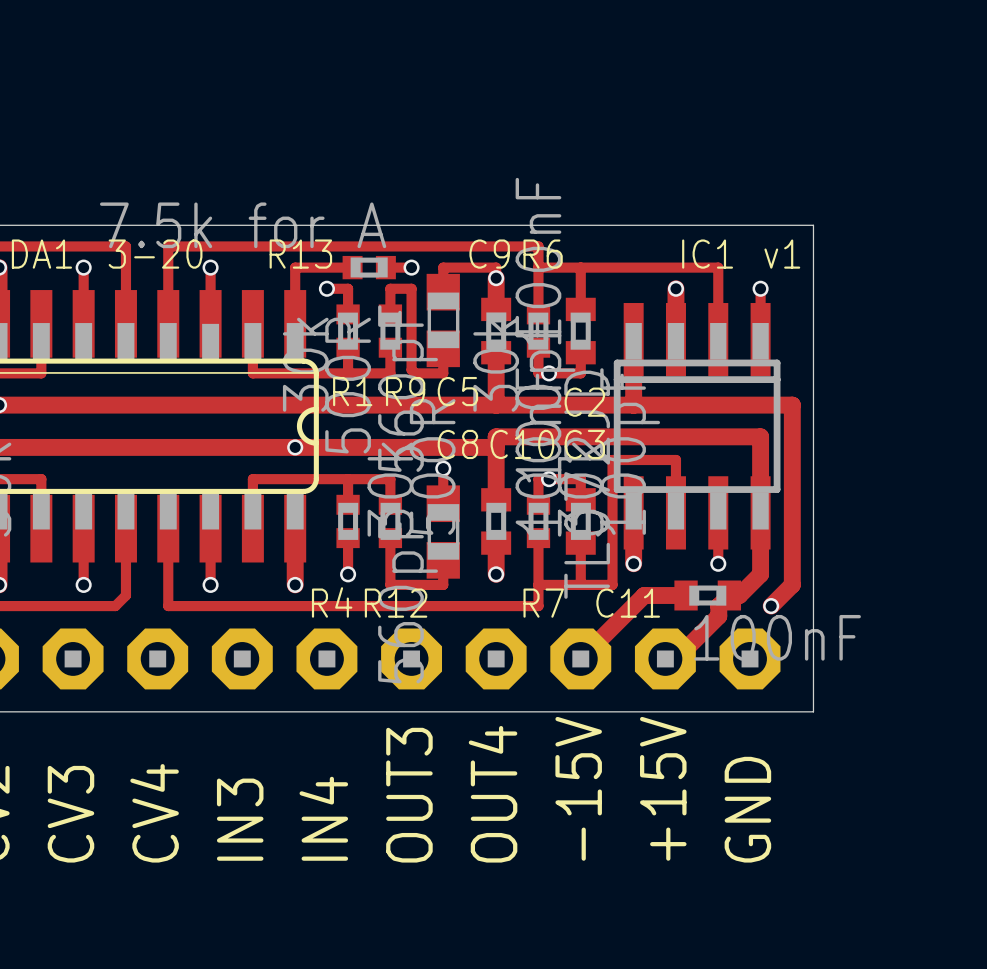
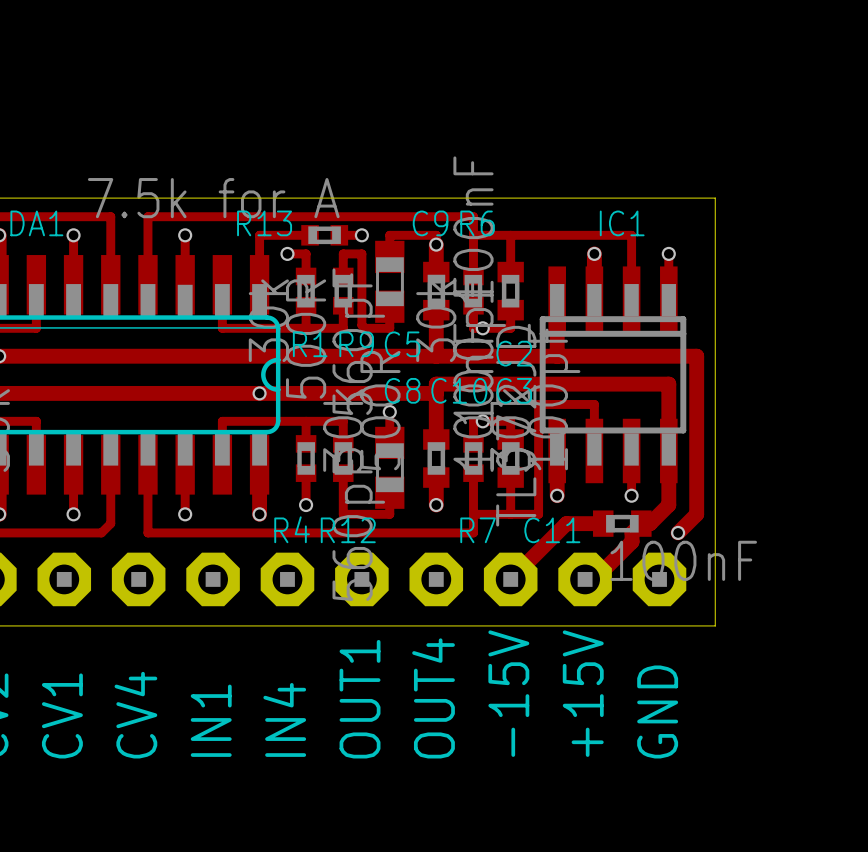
text: 3-20 (155, 254) -> none
text: v1 (782, 254) -> none
OUT3 name: OUT3 (409, 795) -> OUT1 (360, 699)
CV3 name: CV3 (70, 814) -> CV1 (62, 715)
IN3 name: IN3 (240, 819) -> IN1 (211, 720)

